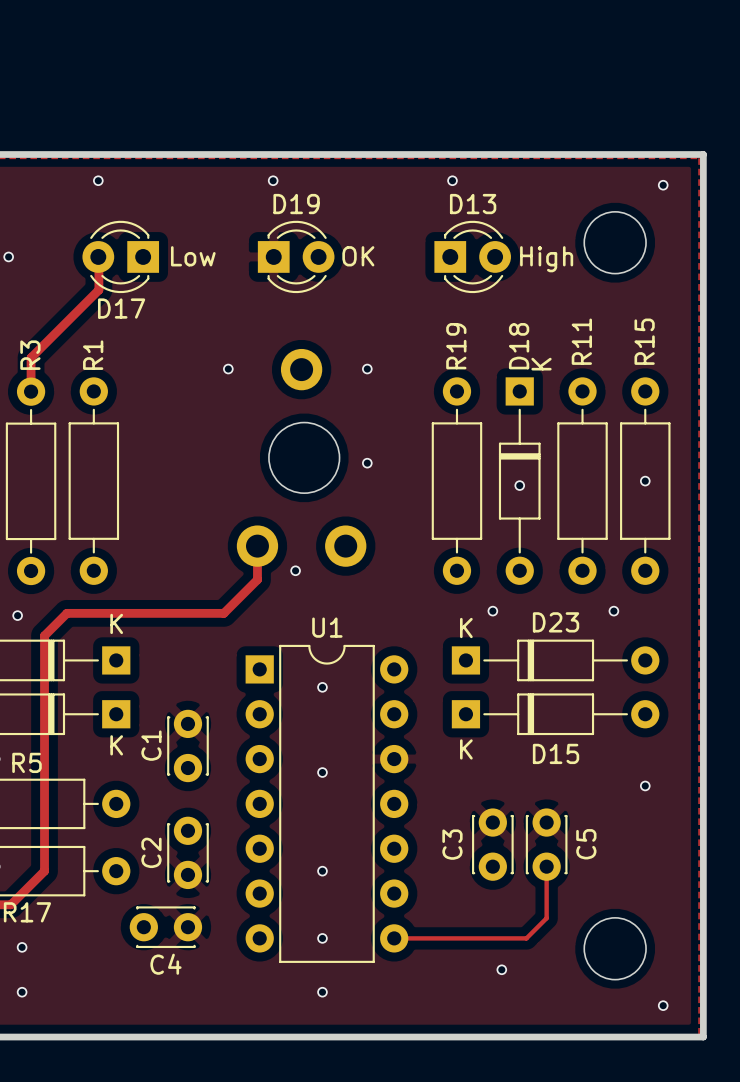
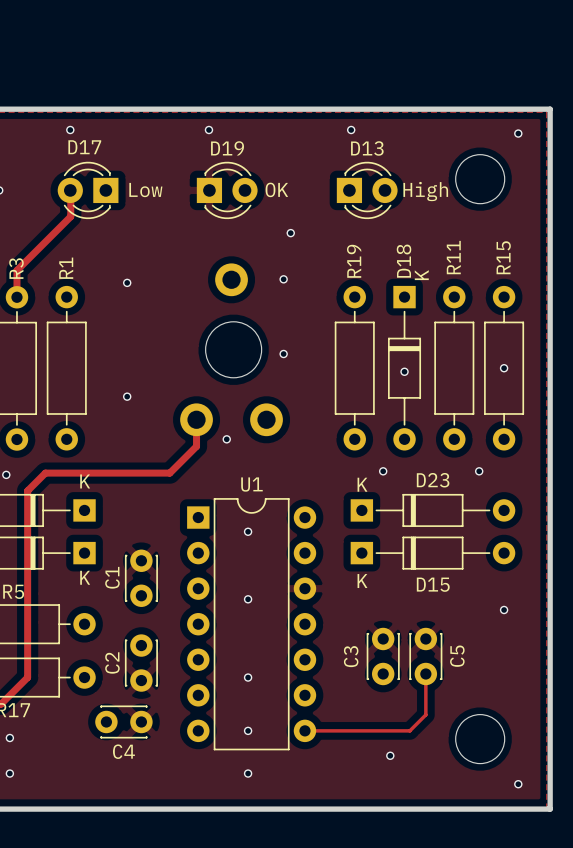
D17 name position: D17 (121, 308) -> D17 (84, 147)
via: none -> (290, 233)
via position: (228, 369) -> (127, 282)
via: none -> (127, 396)

